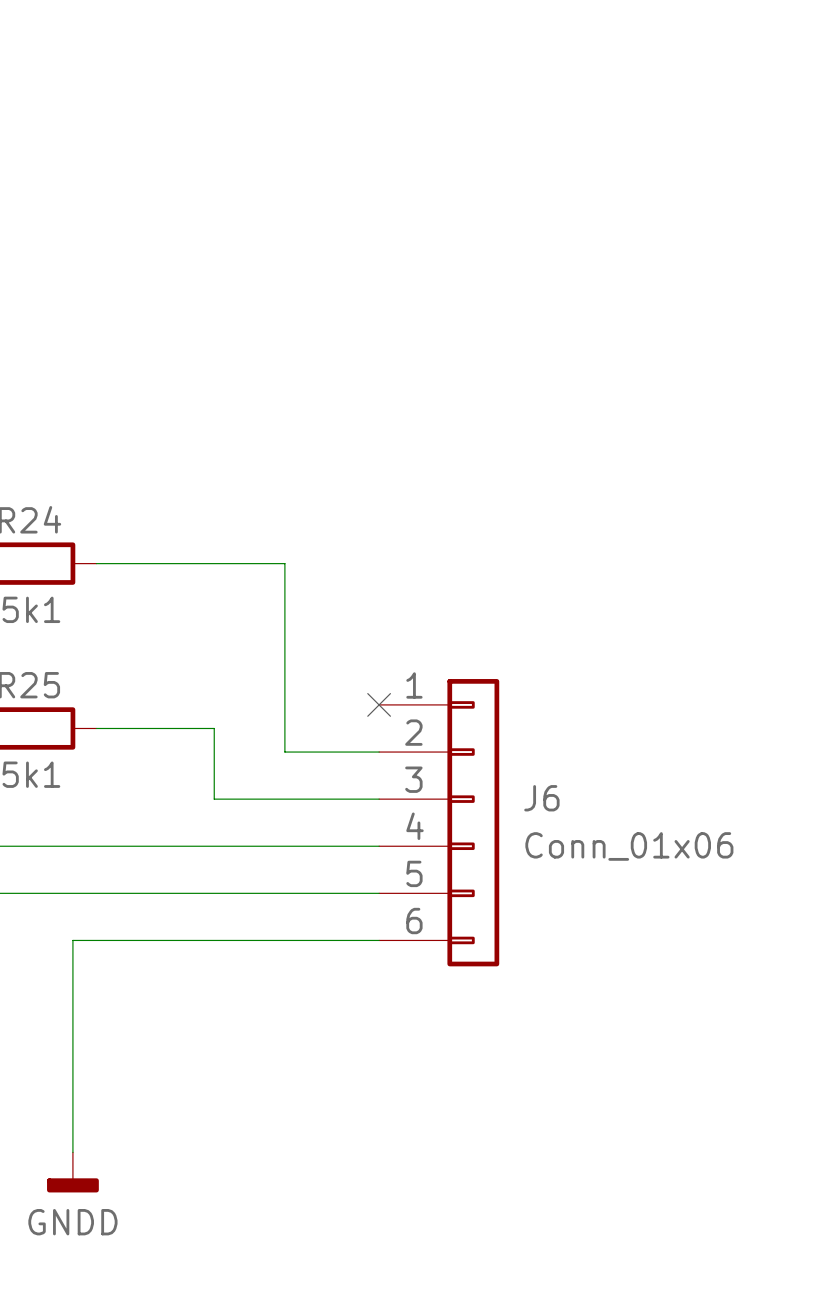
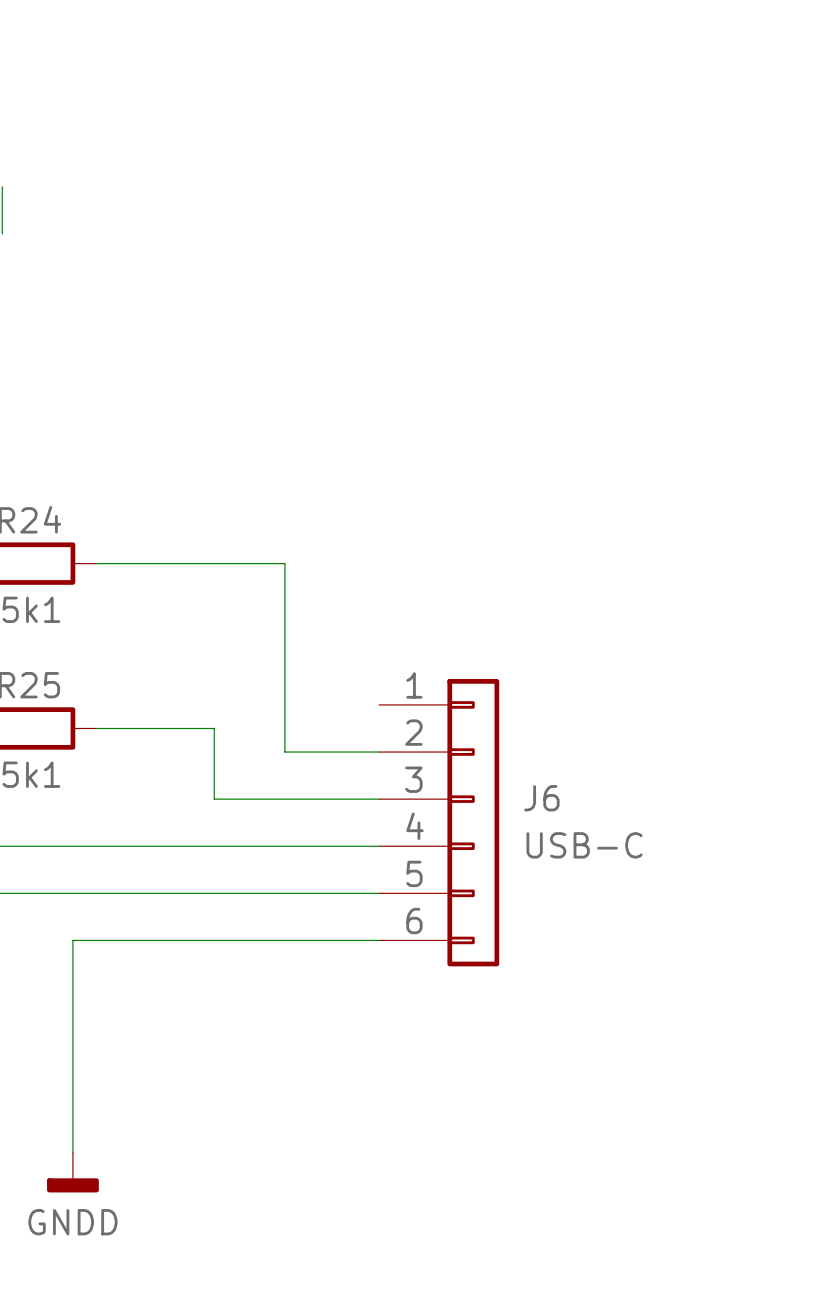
wire: none -> (2, 186) (2, 233)
no-connect mark: (379, 704) -> none
J6 value: Conn_01x06 (629, 846) -> USB-C (584, 845)

